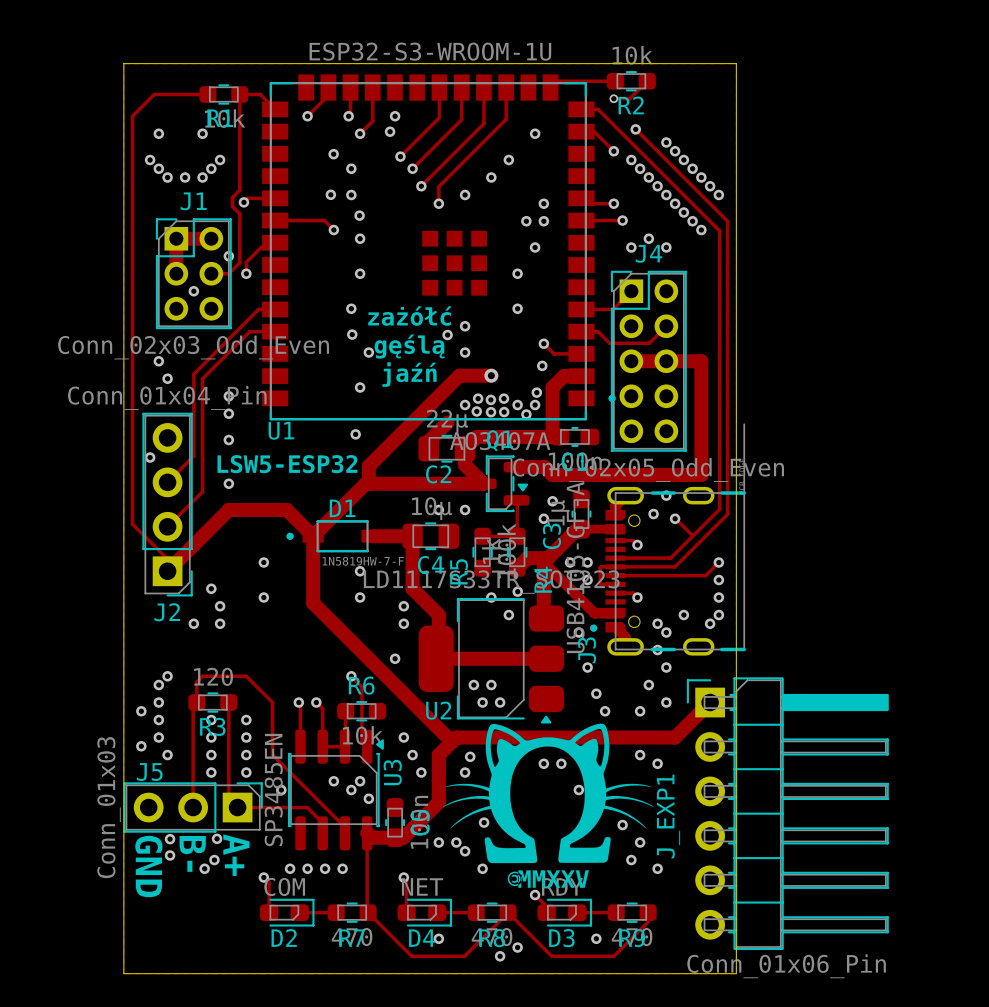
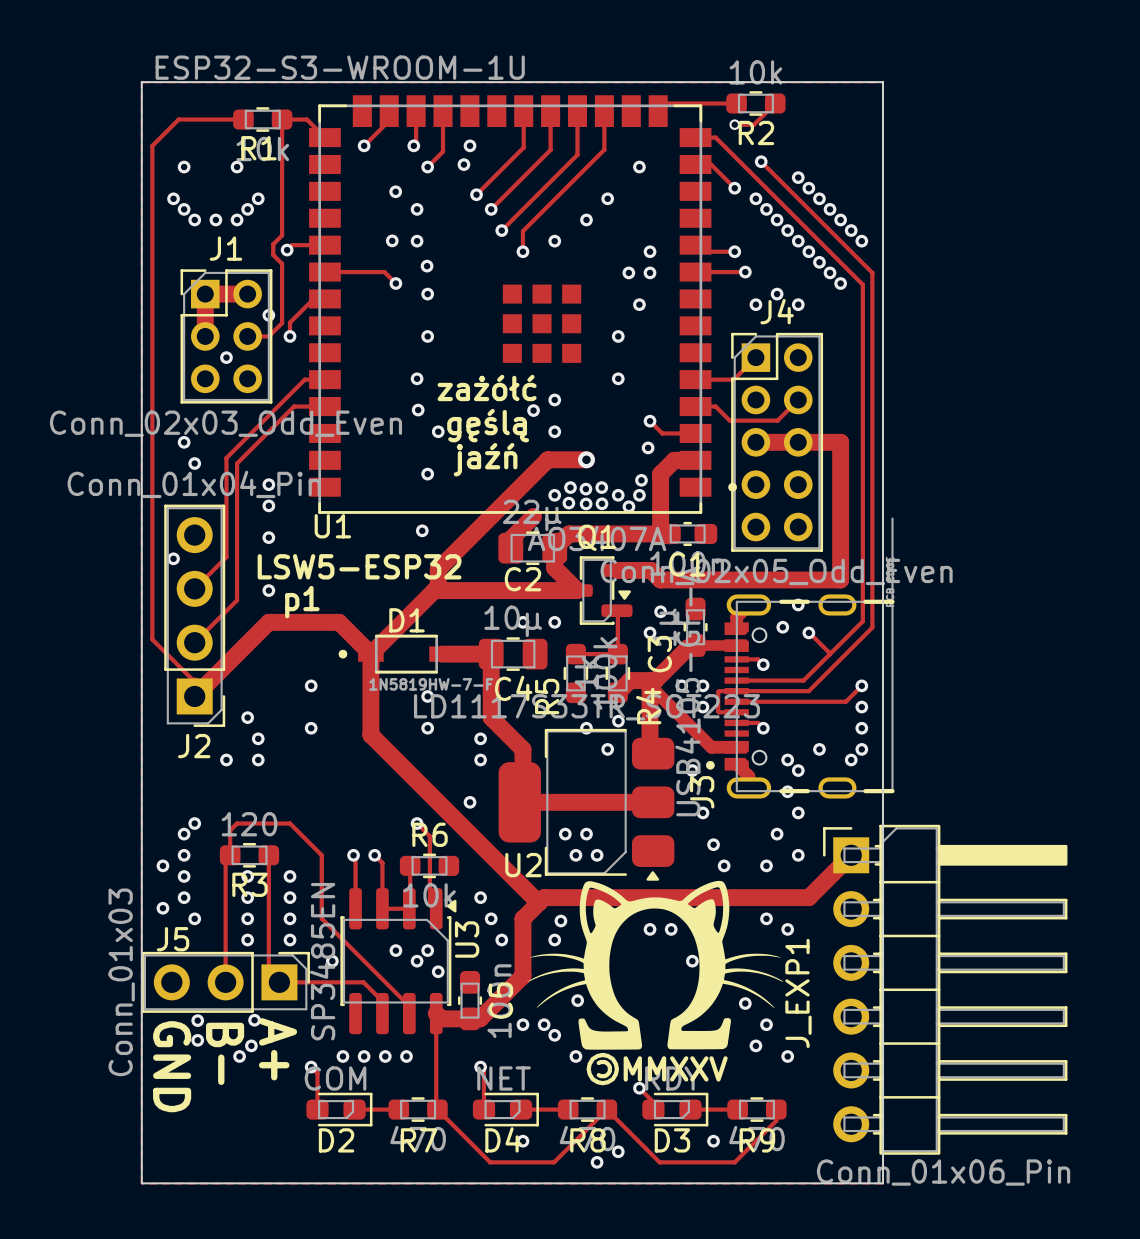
U1 value position: ESP32-S3-WROOM-1U (430, 51) -> ESP32-S3-WROOM-1U (340, 67)
text: none -> p1 (302, 602)

